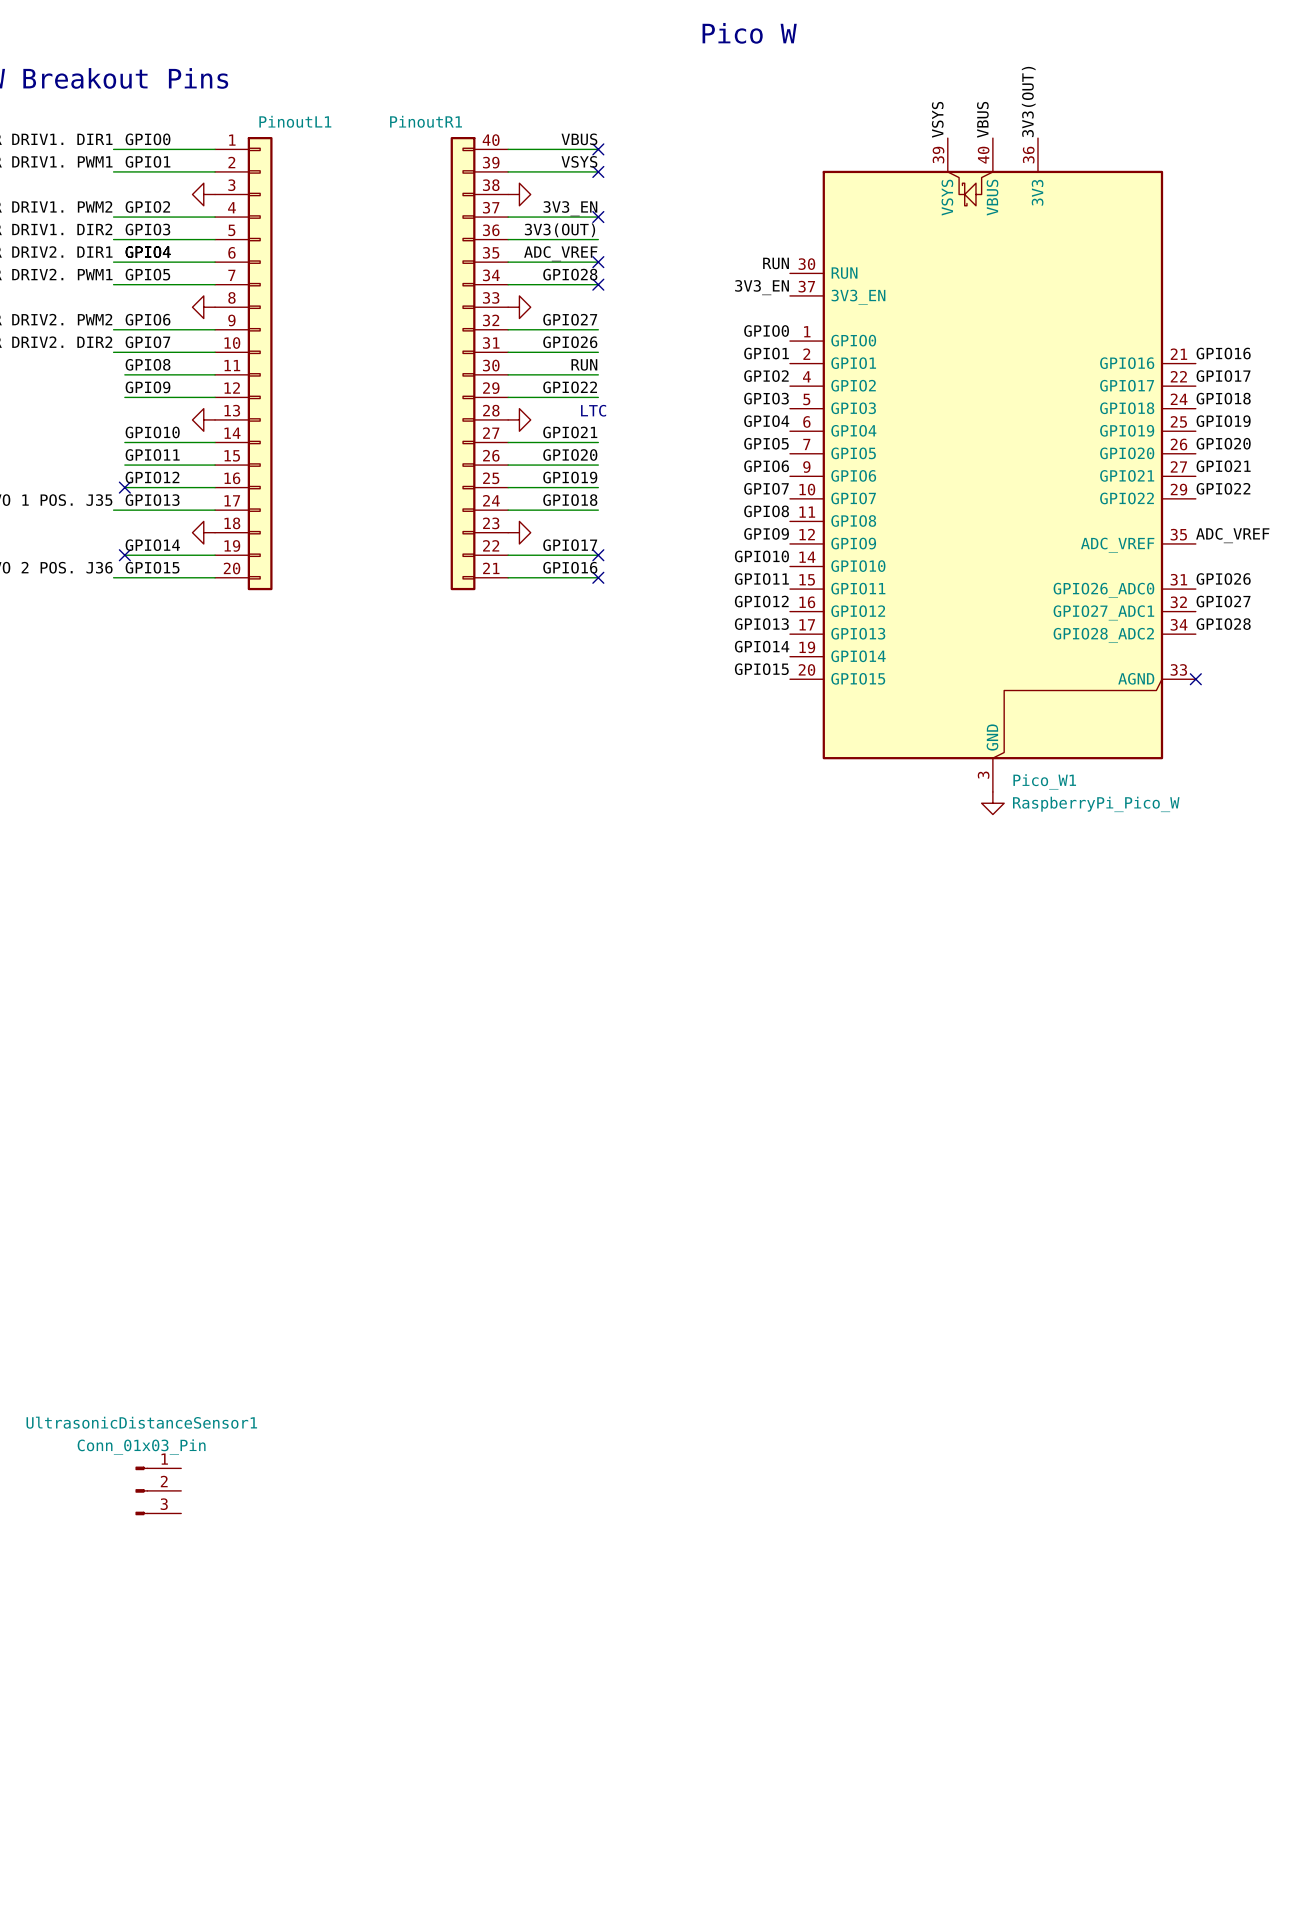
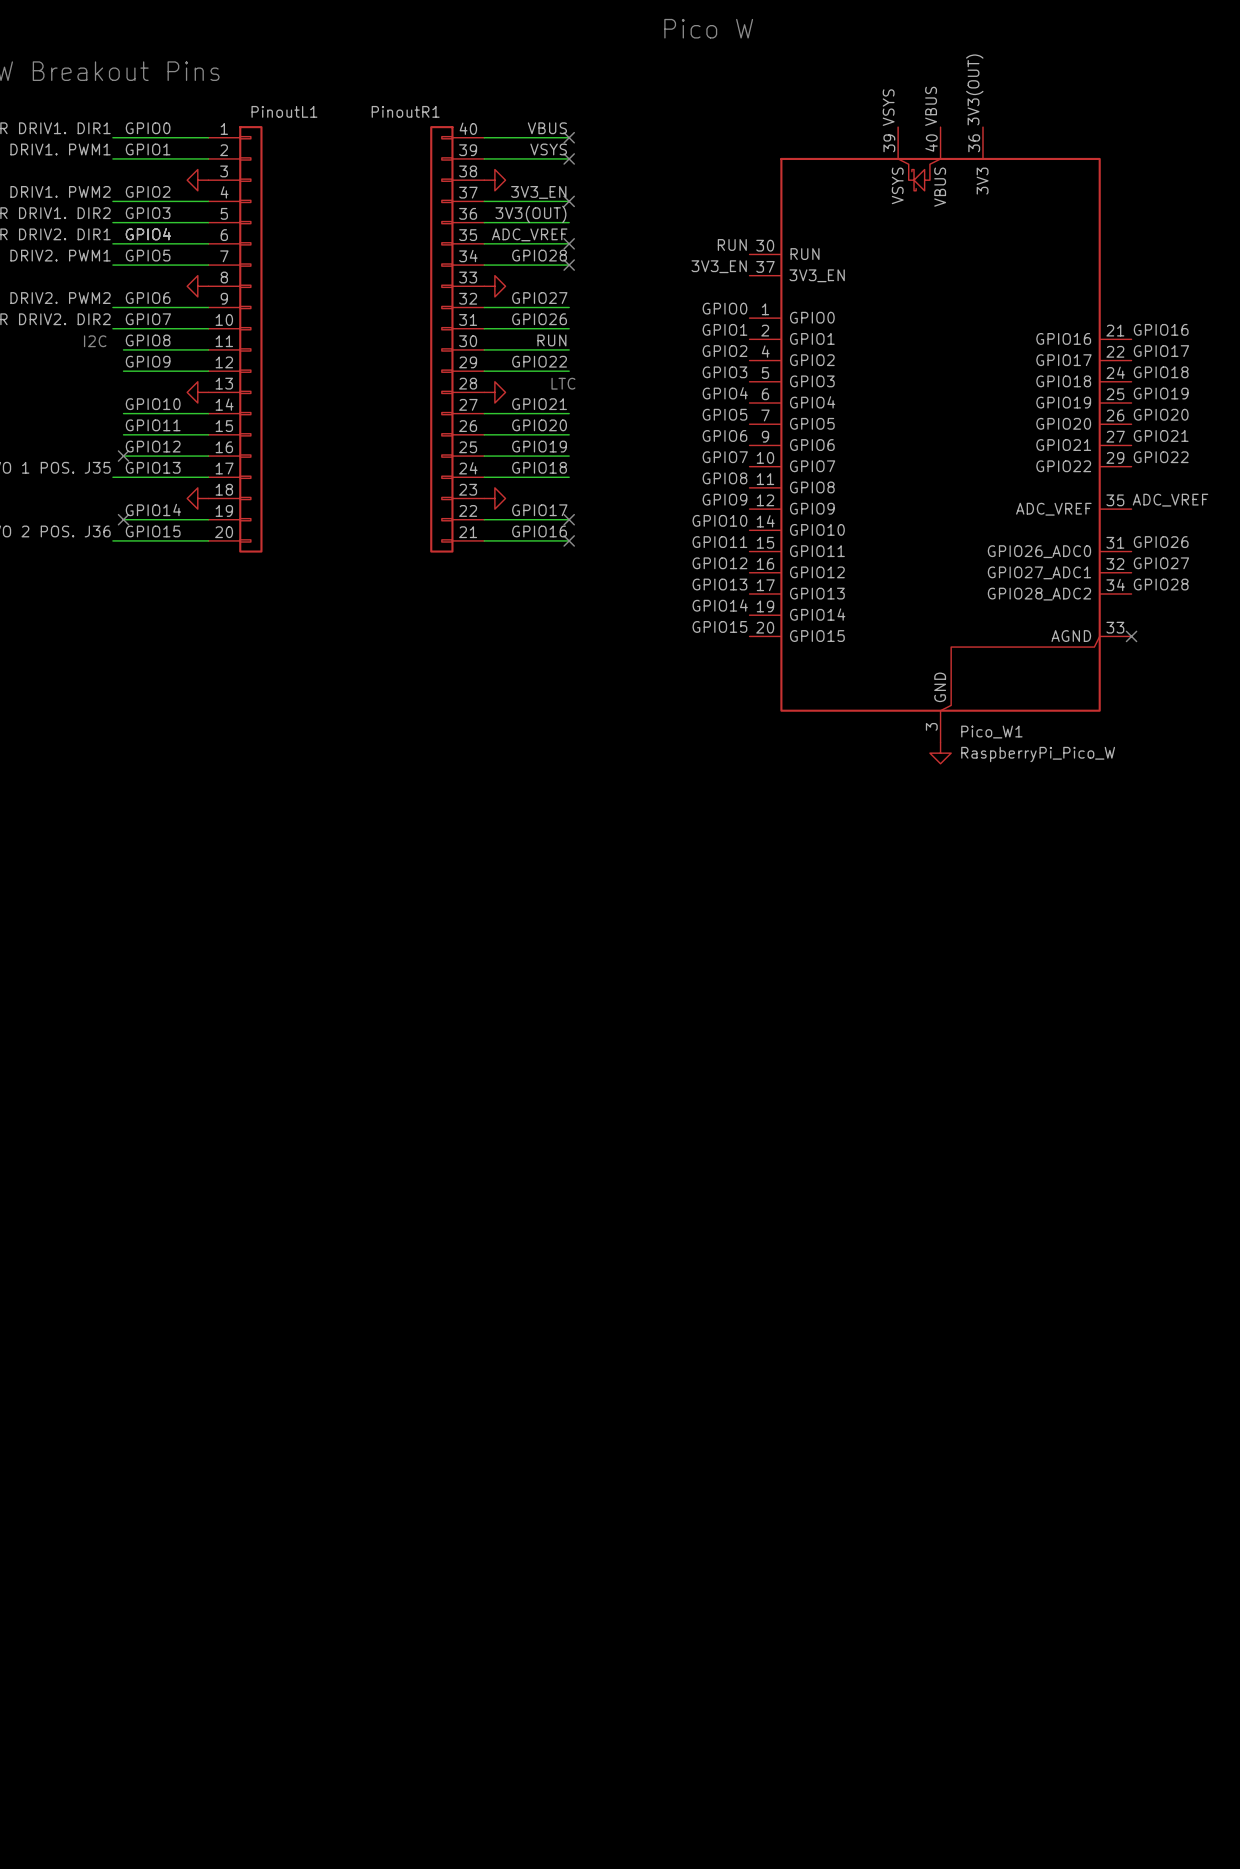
text: none -> I2C (95, 341)
UltrasonicDistanceSensor1: Conn_01x03_Pin (158, 1490) -> none

